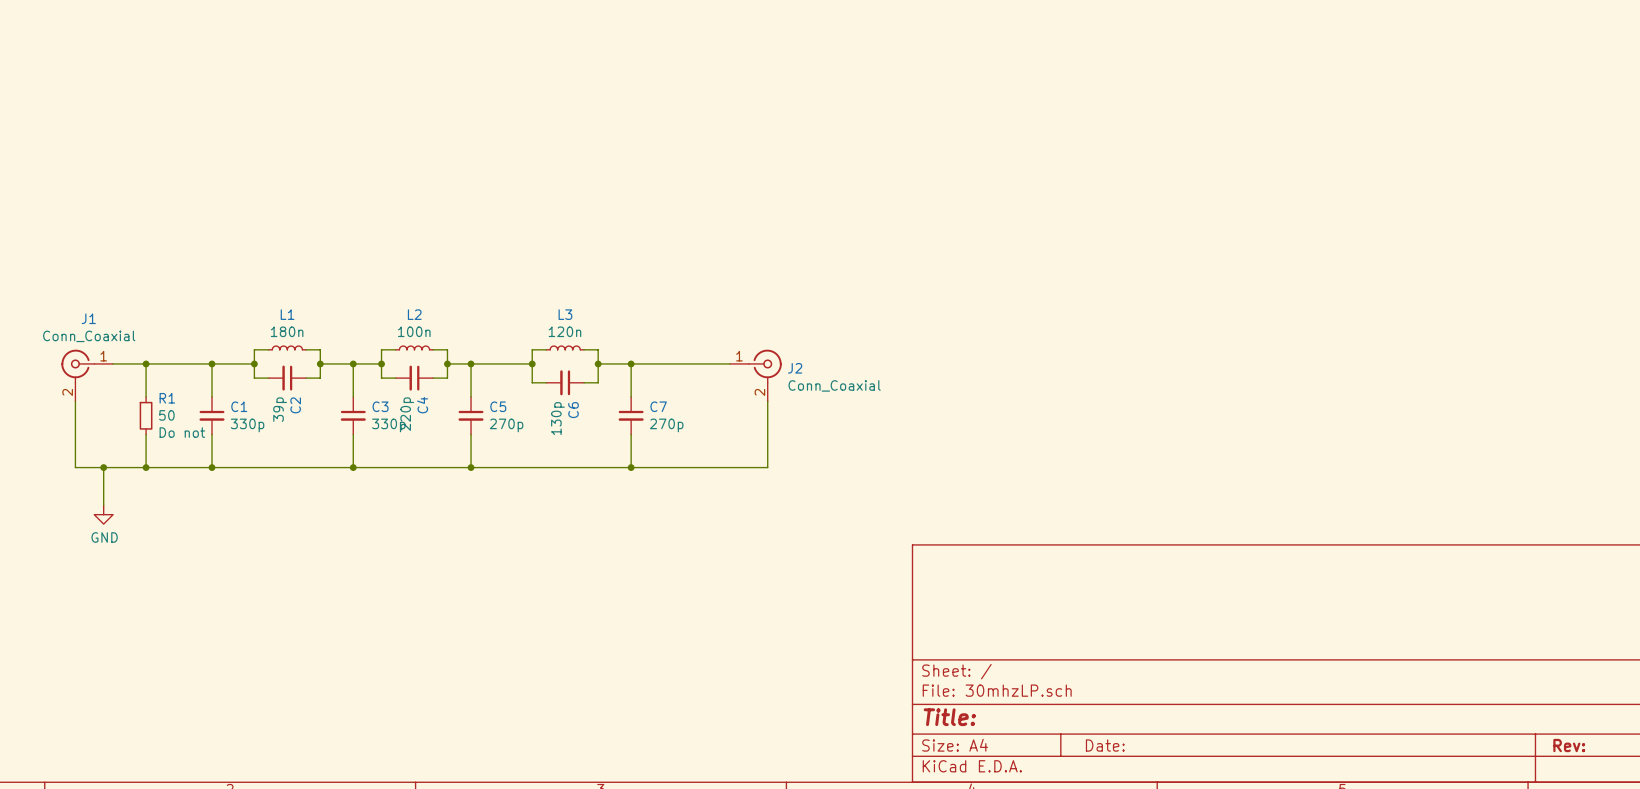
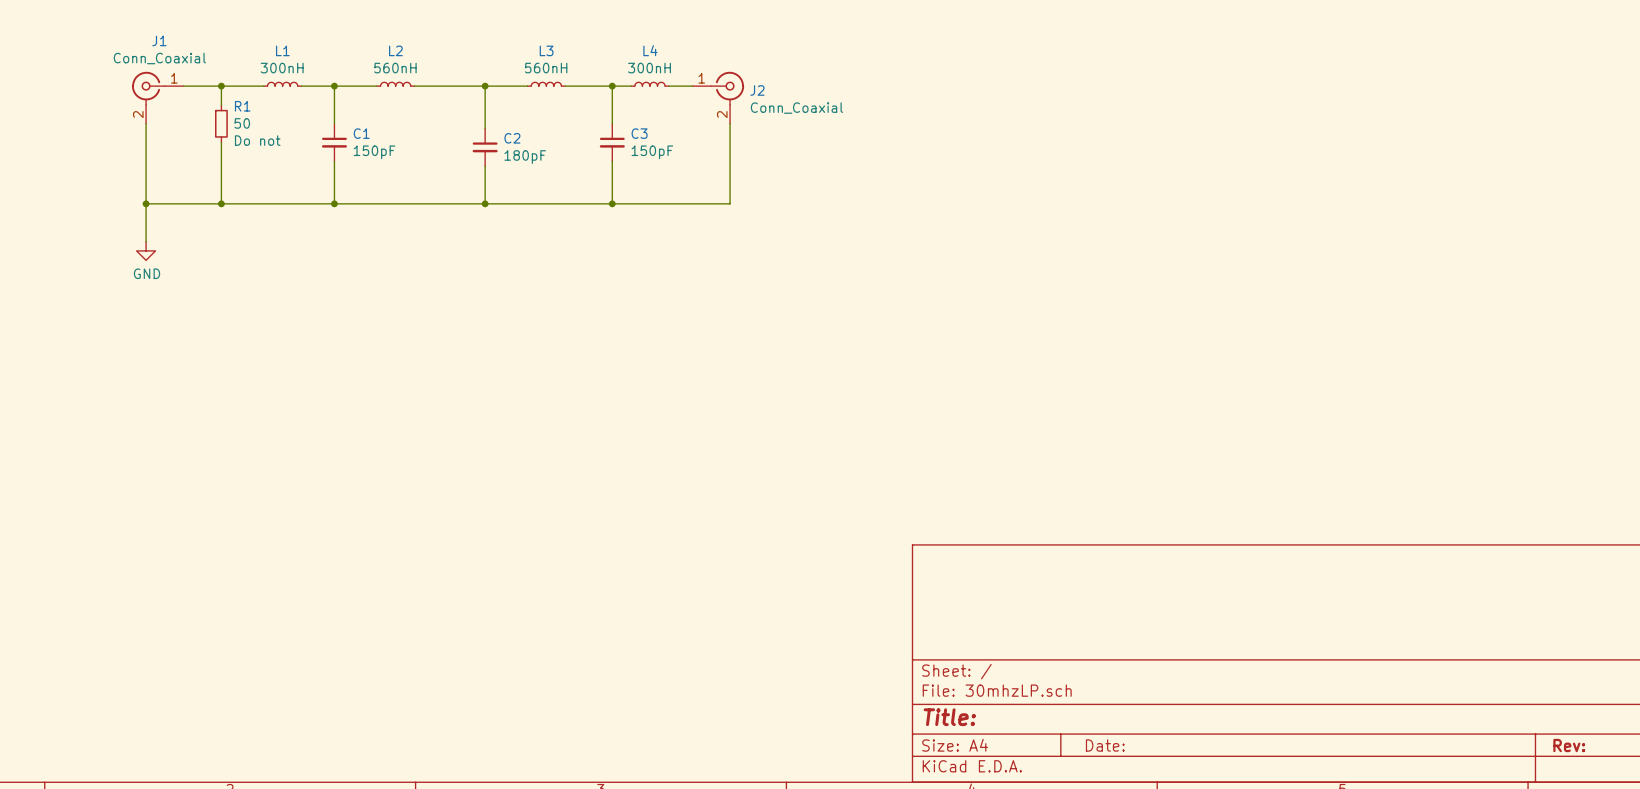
L4: none -> 300nH (649, 84)
wire: none -> (183, 86) (263, 86)
wire: none -> (221, 86) (221, 104)
junction: none -> (221, 86)
wire: none -> (301, 86) (376, 86)
wire: none -> (334, 86) (334, 123)
junction: none -> (334, 86)
wire: none -> (414, 86) (527, 86)
wire: none -> (485, 86) (485, 128)
junction: none -> (485, 86)
wire: none -> (565, 86) (631, 86)
wire: none -> (612, 86) (612, 123)
junction: none -> (612, 86)
wire: none -> (668, 86) (692, 86)
wire: none -> (146, 123) (146, 241)
wire: none -> (730, 123) (730, 203) (146, 203)
wire: none -> (221, 142) (221, 203)
wire: none -> (334, 161) (334, 203)
wire: none -> (612, 161) (612, 203)
wire: none -> (485, 166) (485, 203)
junction: none -> (146, 203)
junction: none -> (221, 203)
junction: none -> (334, 203)
junction: none -> (485, 203)
junction: none -> (612, 203)
power symbol: none -> GND (146, 250)
L1 value: 180n (287, 331) -> 300nH (282, 68)
L2 value: 100n (414, 331) -> 560nH (395, 68)
L3 value: 120n (564, 331) -> 560nH (546, 68)
L1 position: (287, 347) -> (282, 84)
L2 position: (414, 347) -> (395, 84)
L3 position: (565, 347) -> (546, 84)
wire: (268, 349) (254, 349) (254, 378) (268, 378) -> none
wire: (306, 349) (320, 349) (320, 378) (306, 378) -> none
wire: (395, 349) (381, 349) (381, 378) (395, 378) -> none
wire: (433, 349) (447, 349) (447, 378) (433, 378) -> none
wire: (546, 349) (532, 349) (532, 382) (546, 382) -> none
wire: (584, 349) (598, 349) (598, 382) (584, 382) -> none
wire: (113, 363) (254, 363) -> none
wire: (146, 363) (146, 396) -> none
junction: (146, 363) -> none
wire: (211, 363) (211, 396) -> none
junction: (211, 363) -> none
junction: (254, 363) -> none
wire: (320, 363) (381, 363) -> none
junction: (320, 363) -> none
wire: (353, 363) (353, 396) -> none
junction: (353, 363) -> none
junction: (381, 363) -> none
wire: (447, 363) (532, 363) -> none
junction: (447, 363) -> none
wire: (471, 363) (471, 396) -> none
junction: (471, 363) -> none
junction: (532, 363) -> none
wire: (598, 363) (730, 363) -> none
junction: (598, 363) -> none
wire: (631, 363) (631, 396) -> none
junction: (631, 363) -> none
J1 position: (87, 375) -> (157, 97)
J2 position: (755, 375) -> (718, 97)
C2 rotation: 0° (287, 378) -> 90° counterclockwise (485, 147)
C2 position: (287, 378) -> (485, 147)
C4: 220p (414, 378) -> none
C6: 130p (565, 382) -> none
wire: (75, 401) (75, 467) (767, 467) (767, 401) -> none
C2 value: 39p (280, 409) -> 180pF (525, 157)
R1 position: (146, 415) -> (221, 123)
C1 position: (211, 415) -> (334, 142)
C3 position: (353, 415) -> (612, 142)
C5: 270p (471, 415) -> none
C7: 270p (631, 415) -> none
C1 value: 330p (247, 425) -> 150pF (374, 152)
C3 value: 330p (388, 425) -> 150pF (652, 152)
wire: (146, 434) (146, 467) -> none
wire: (211, 434) (211, 467) -> none
wire: (353, 434) (353, 467) -> none
wire: (471, 434) (471, 467) -> none
wire: (631, 434) (631, 467) -> none
wire: (103, 467) (103, 505) -> none
junction: (103, 467) -> none
junction: (146, 467) -> none
junction: (211, 467) -> none
junction: (353, 467) -> none
junction: (471, 467) -> none
junction: (631, 467) -> none
power symbol: GND (103, 514) -> none

